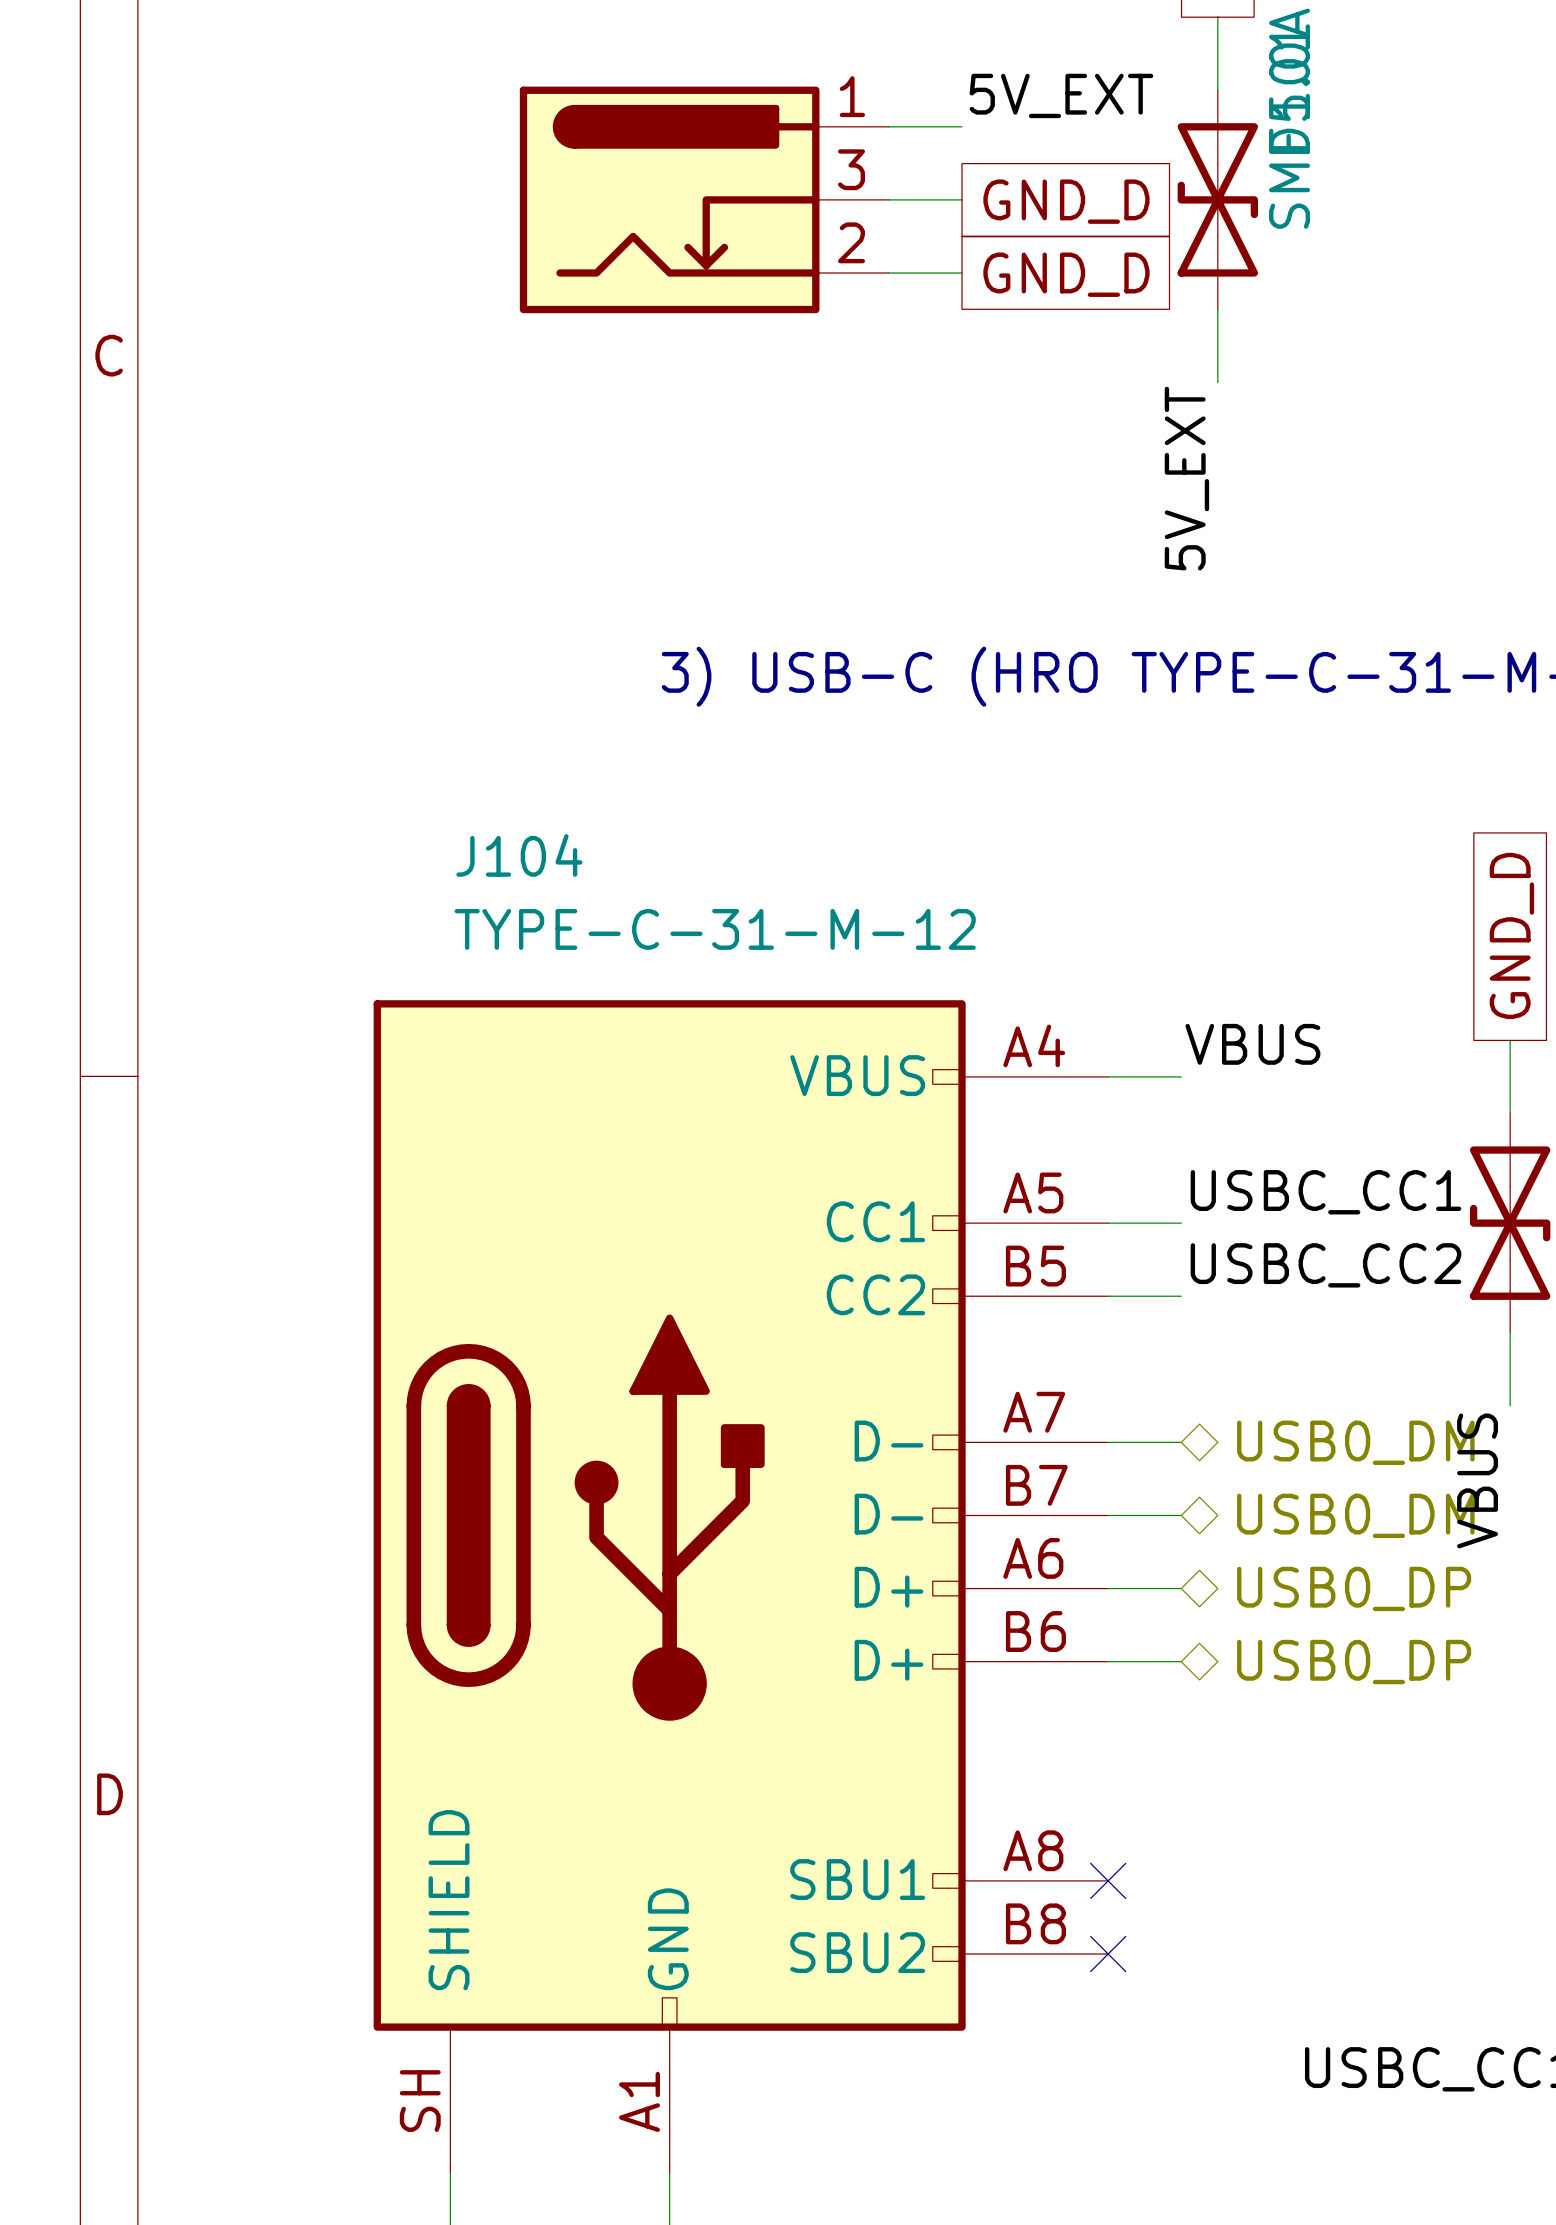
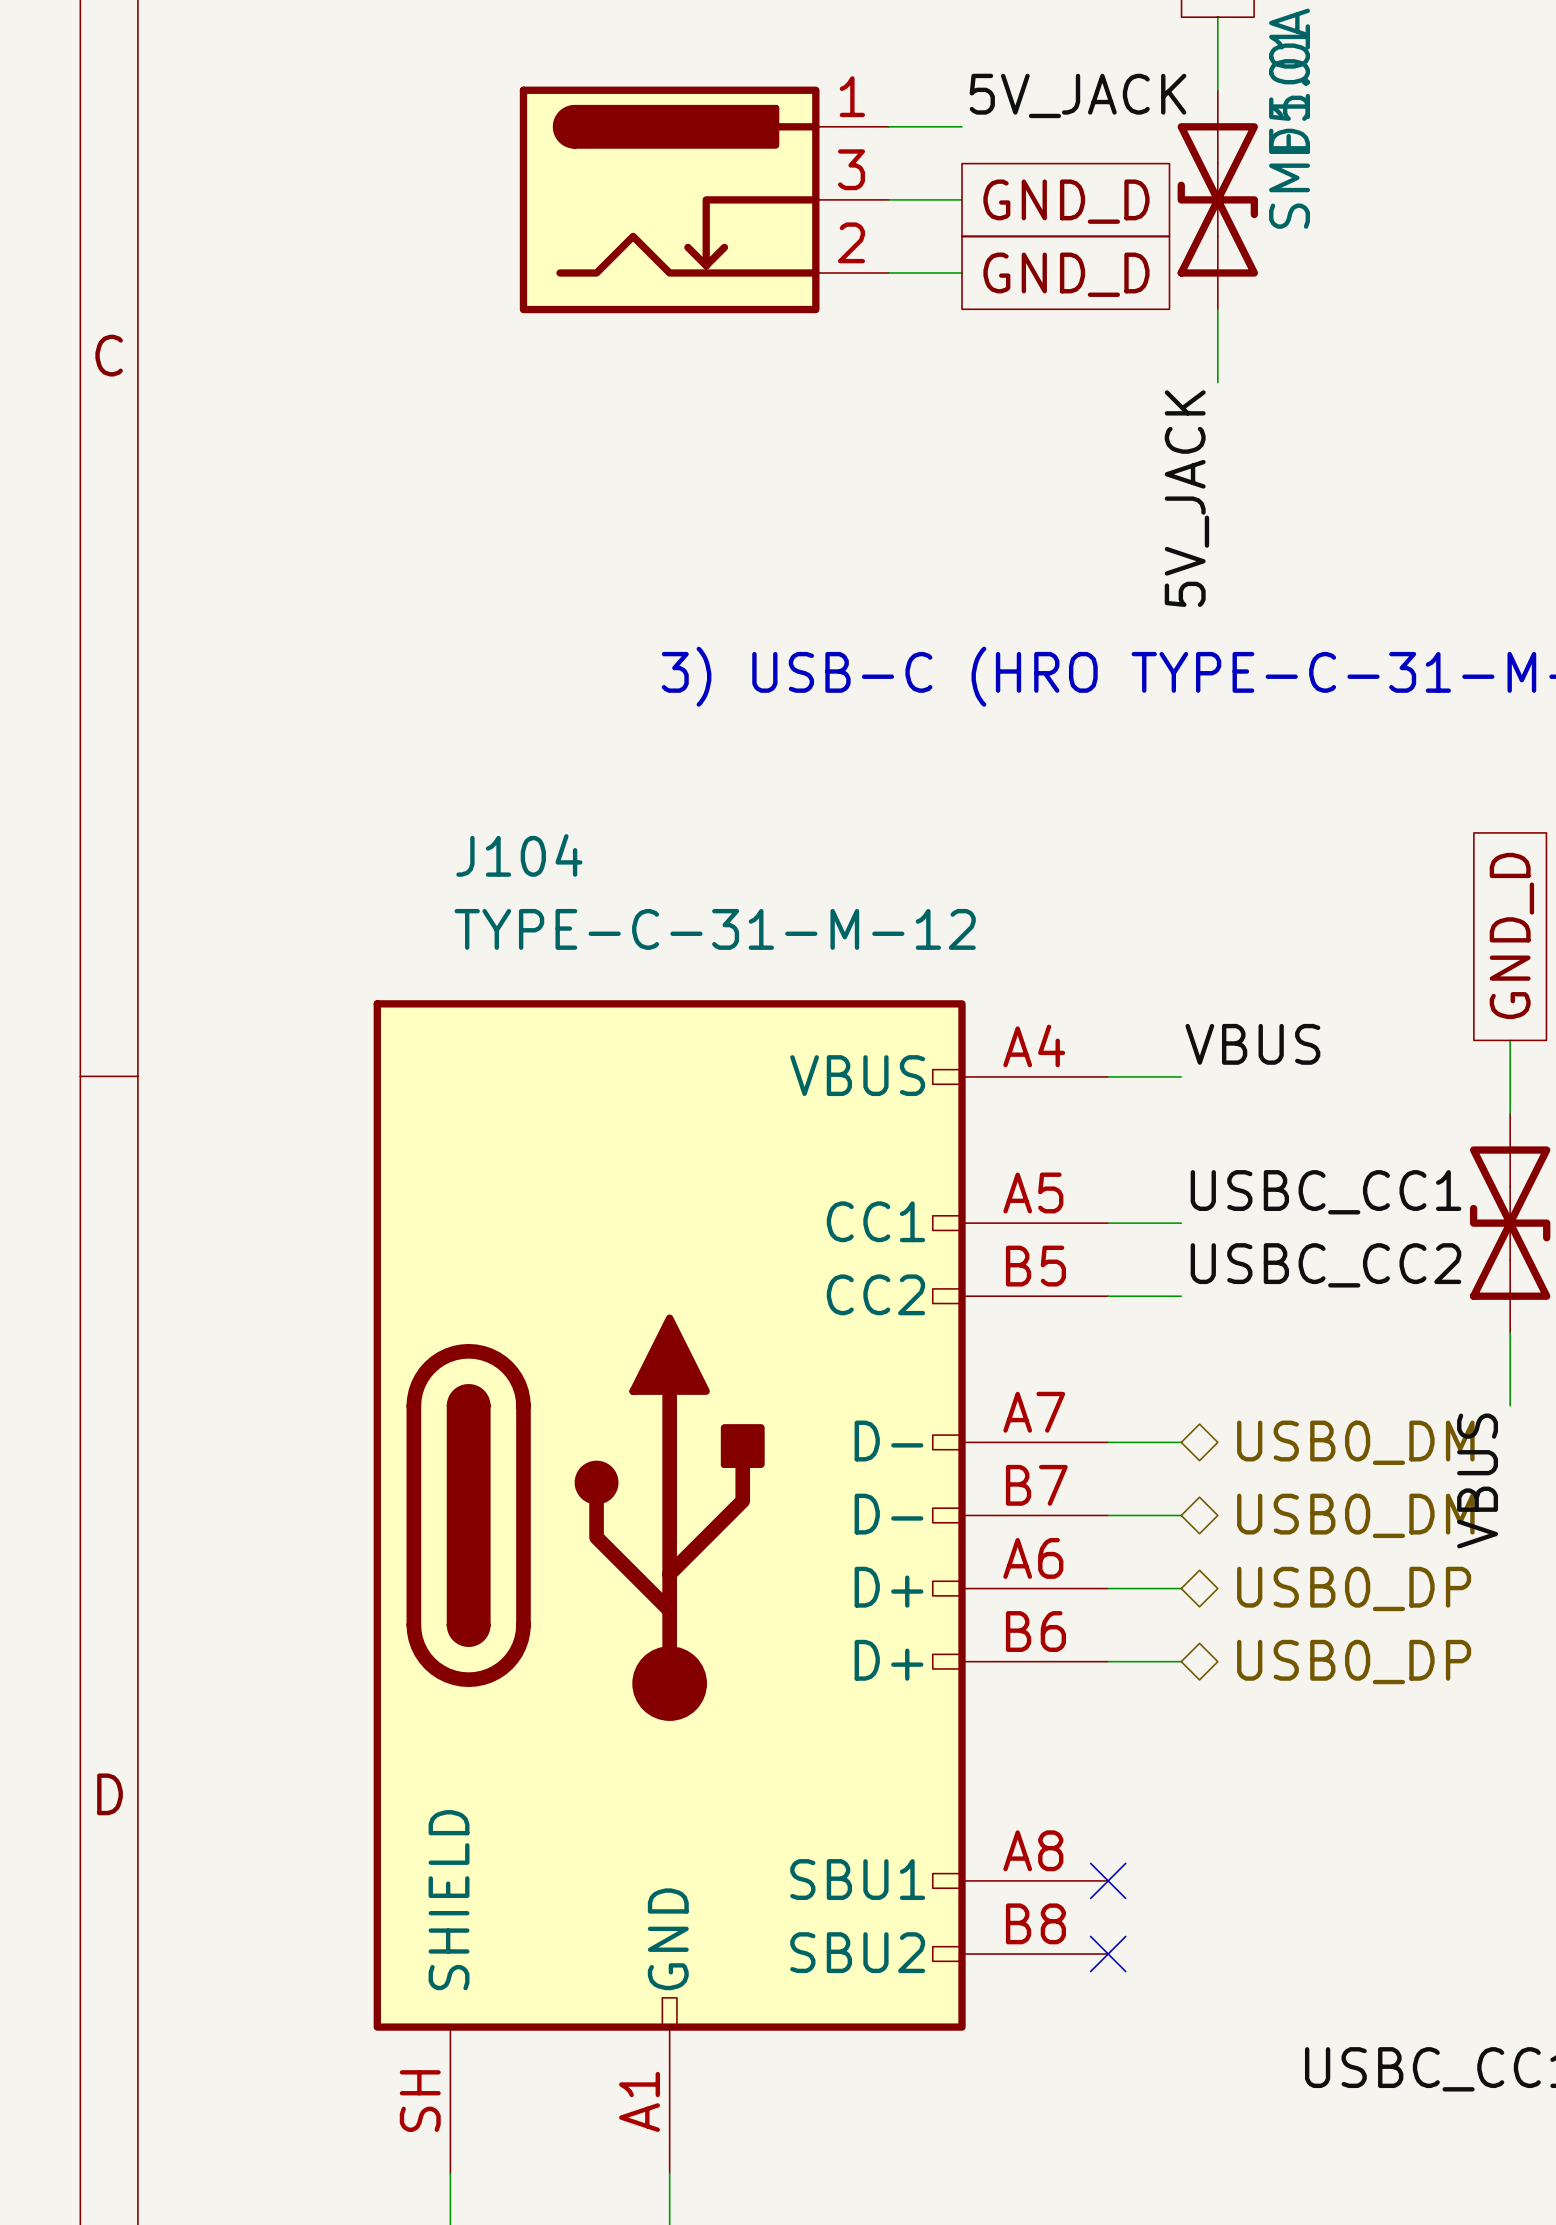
label: 5V_EXT (1061, 95) -> 5V_JACK (1078, 95)
label: 5V_EXT (1186, 478) -> 5V_JACK (1186, 498)

